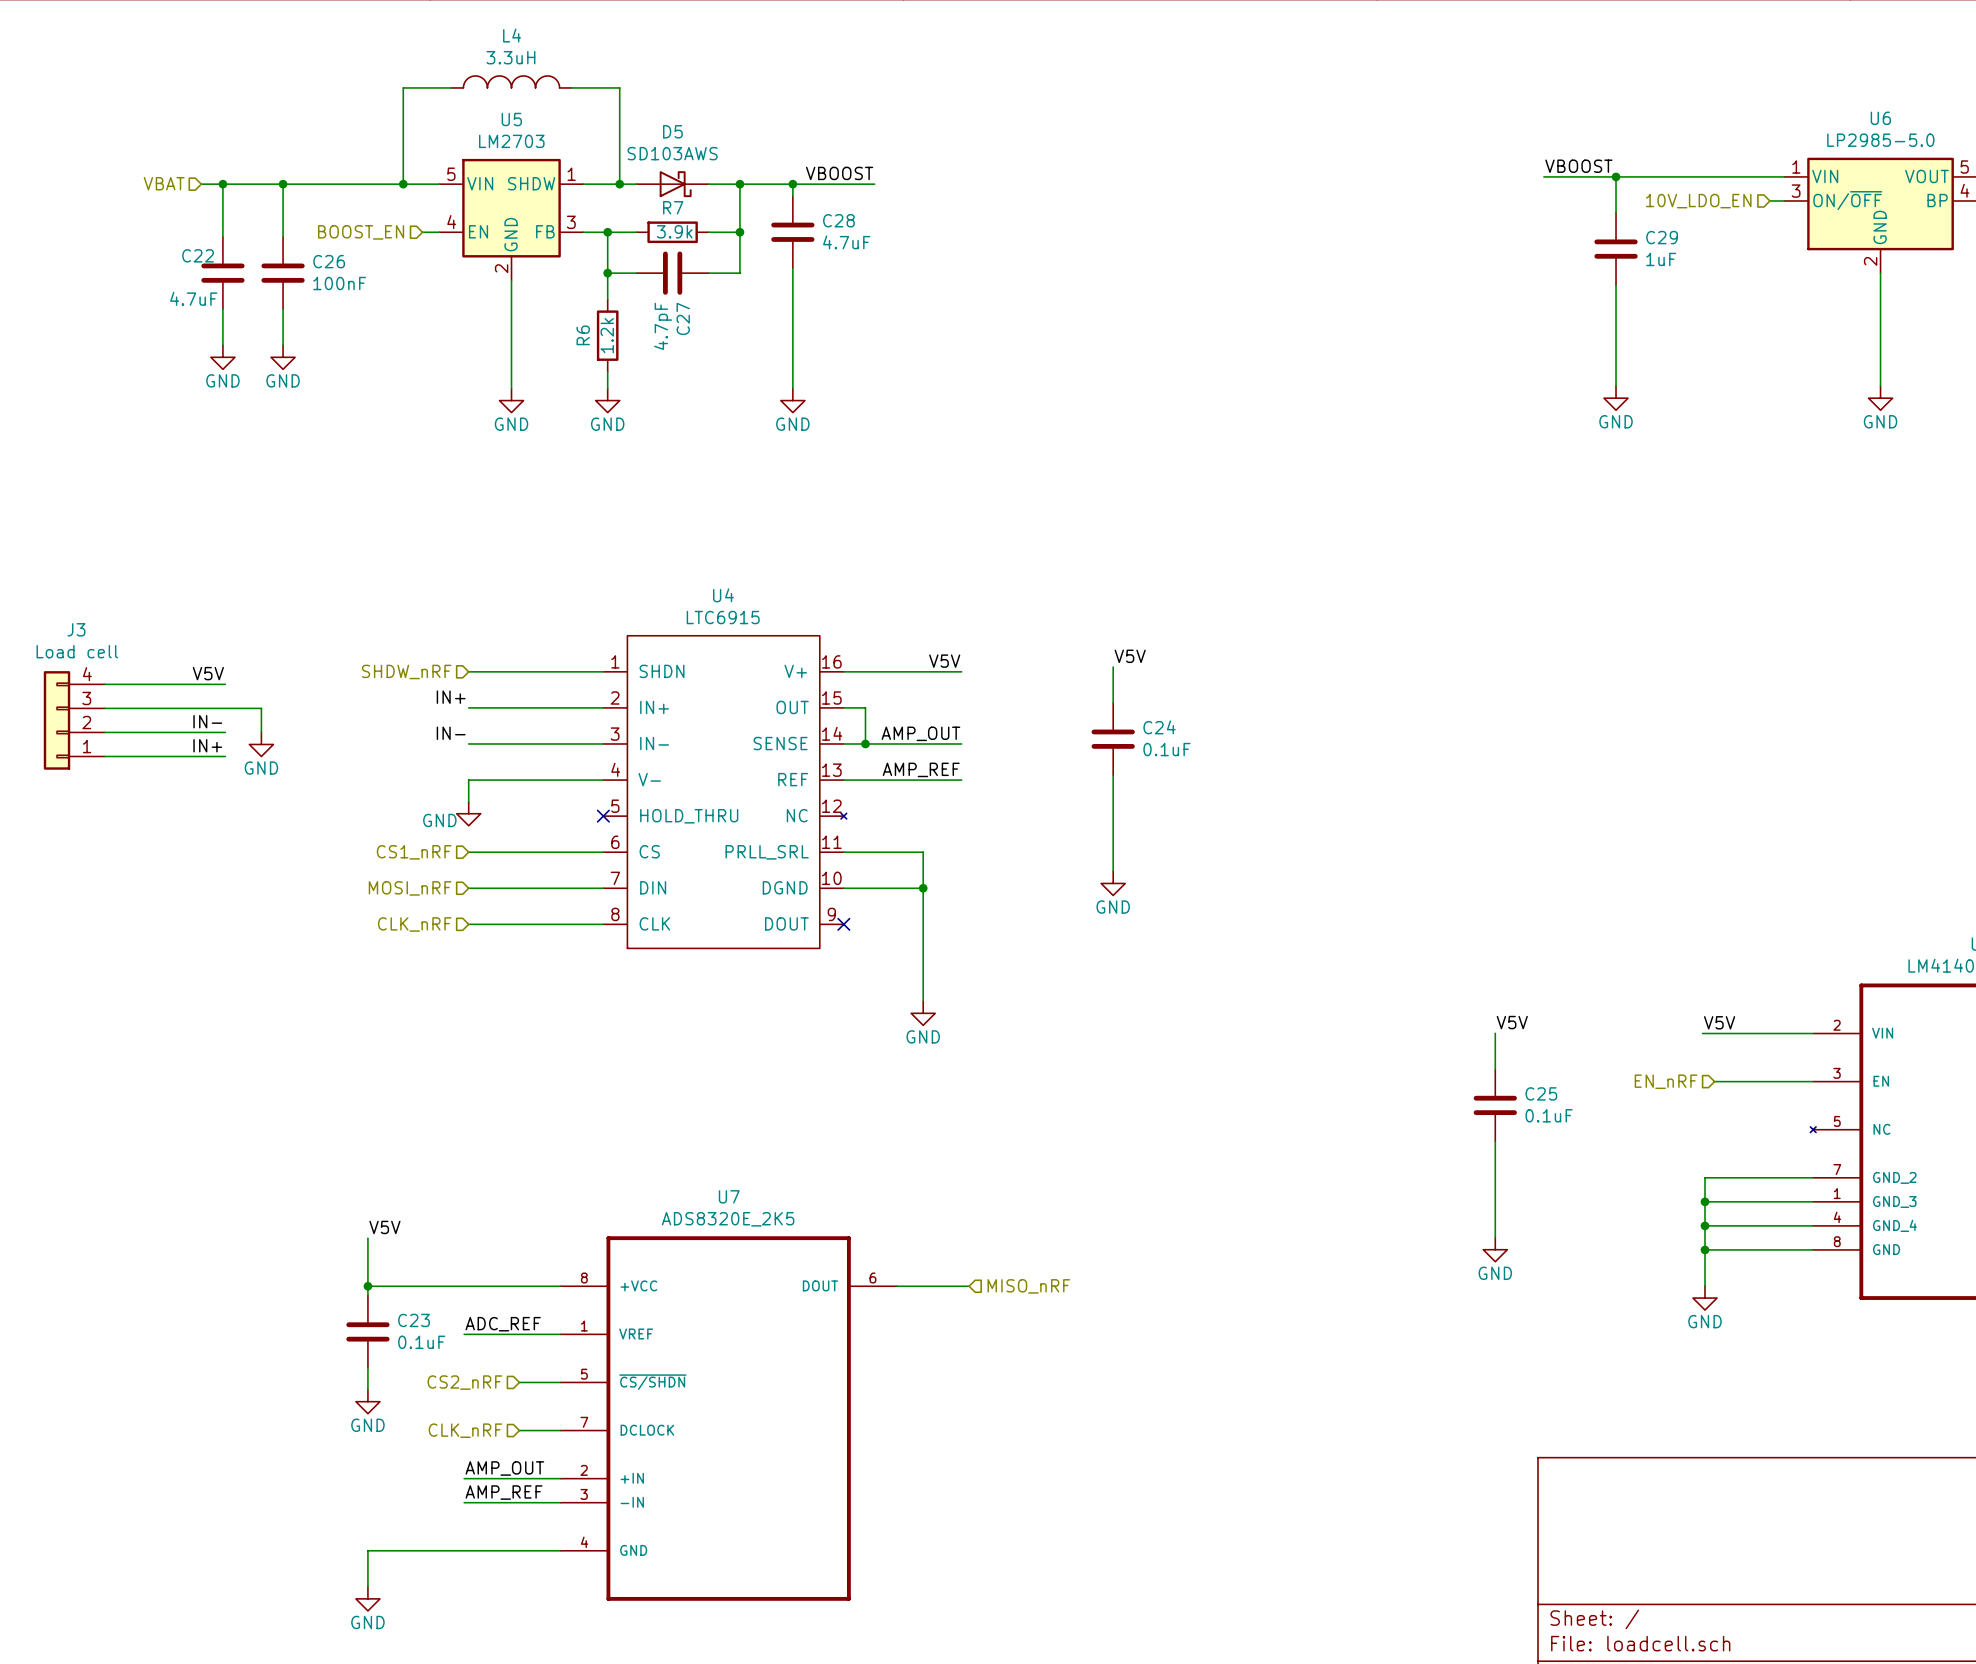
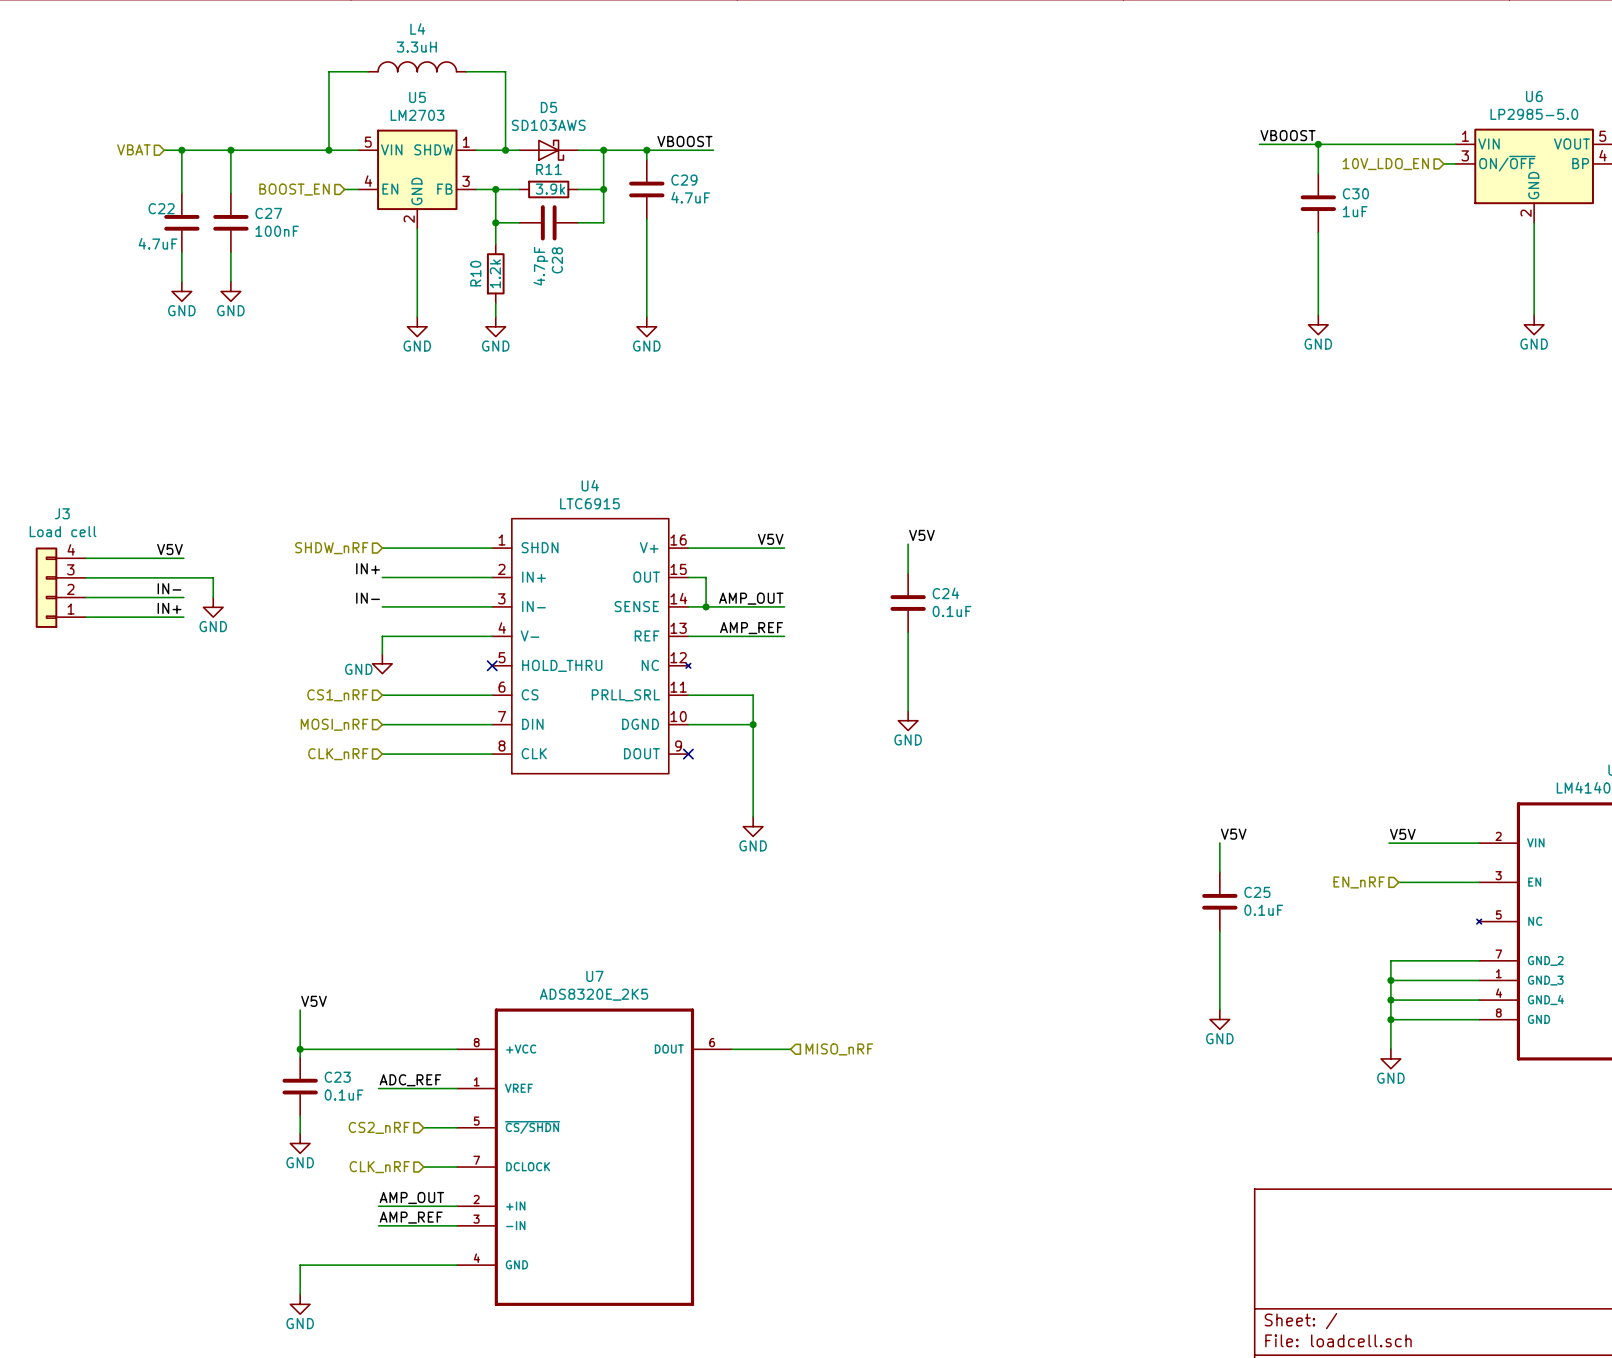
R7 name: R7 (673, 207) -> R11 (548, 169)
C28 name: C28 (838, 220) -> C29 (684, 180)
C29 name: C29 (1662, 237) -> C30 (1355, 193)
C26 name: C26 (329, 261) -> C27 (268, 213)
C27 name: C27 (683, 318) -> C28 (557, 260)
R6 name: R6 (583, 335) -> R10 (475, 273)

